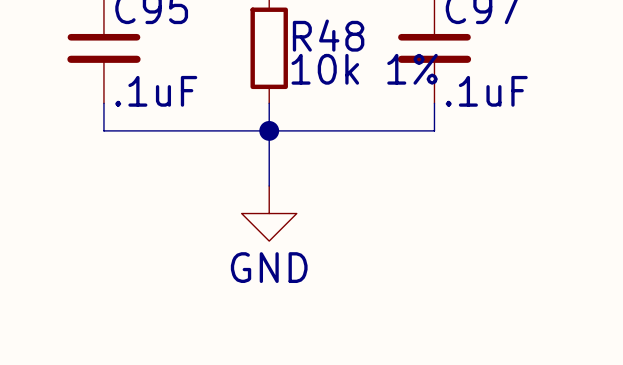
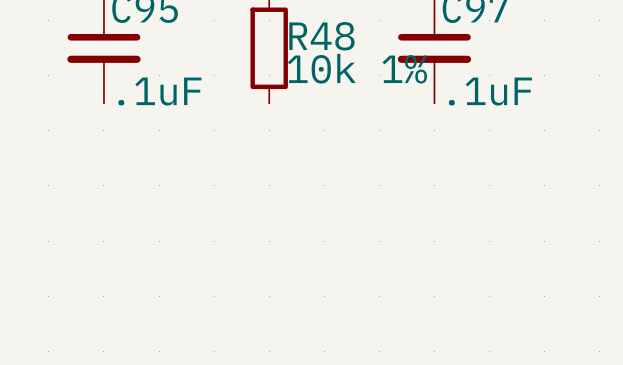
wire: (103, 103) (103, 130) (434, 130) (434, 103) -> none
wire: (269, 103) (269, 185) -> none
junction: (269, 130) -> none
power symbol: GND (269, 213) -> none

